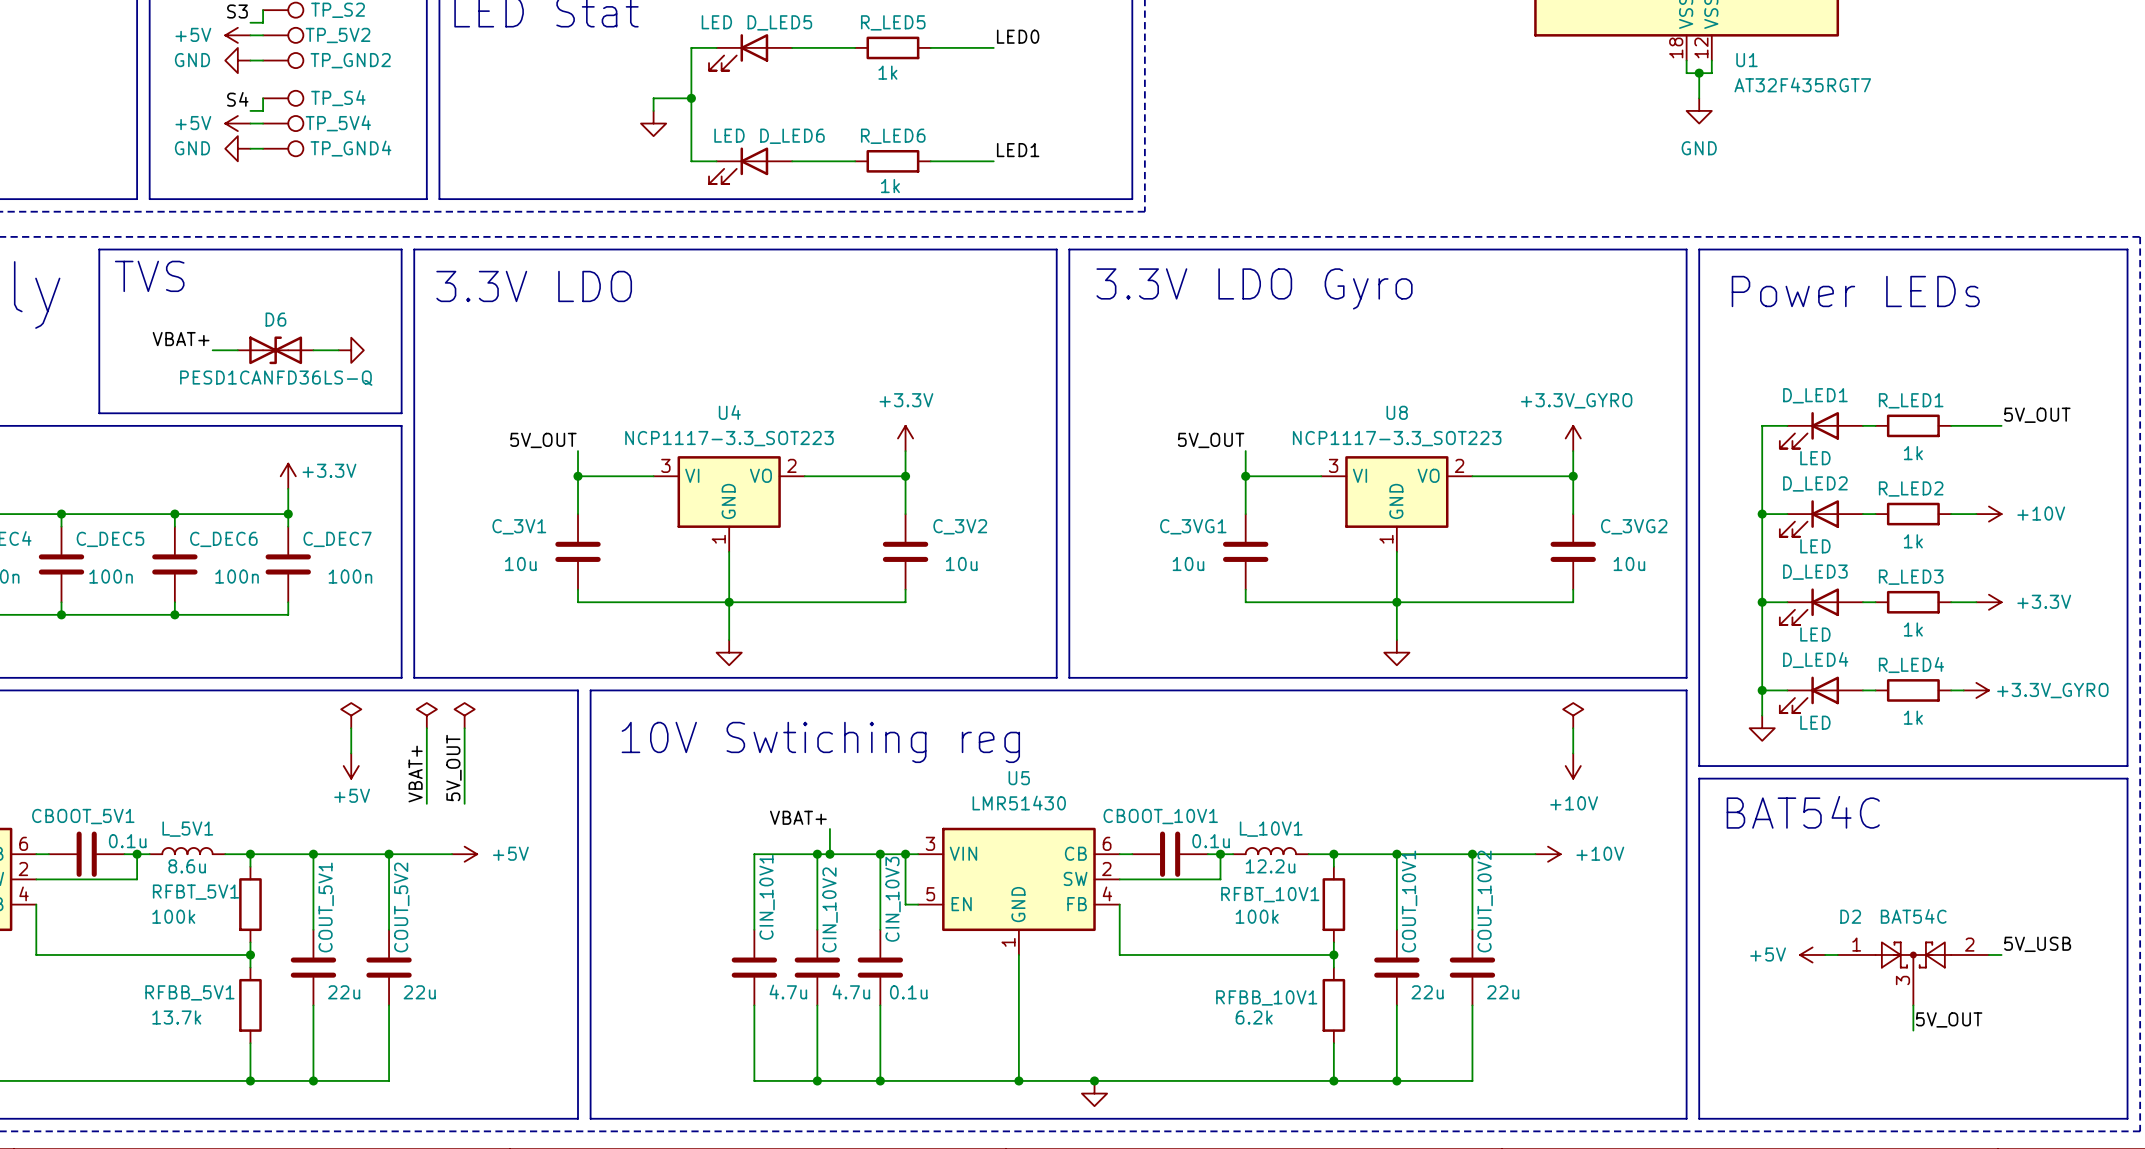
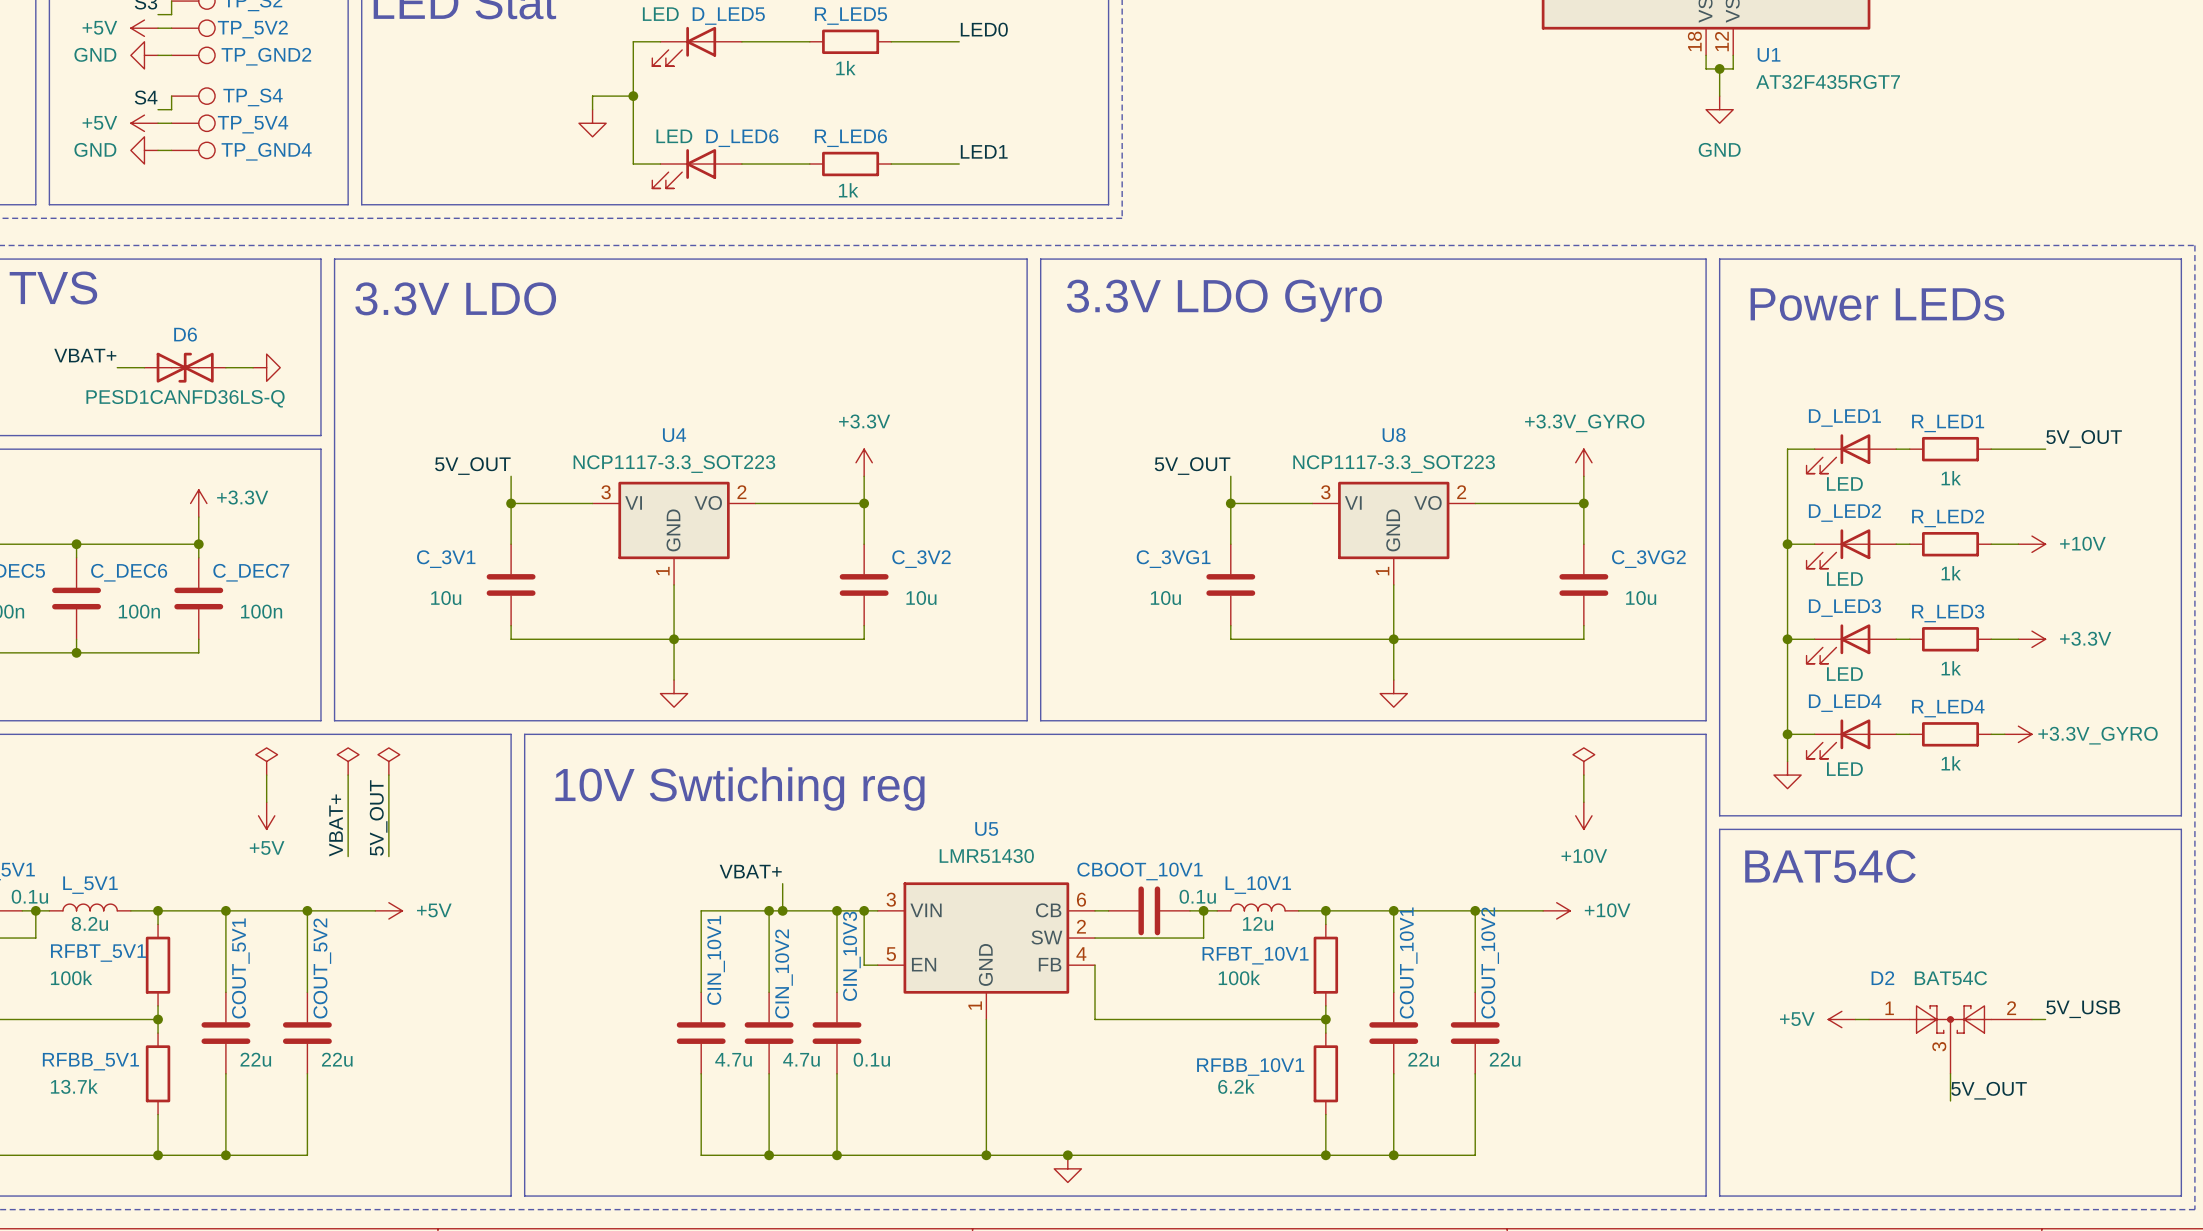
L_5V1 value: 8.6u (187, 866) -> 8.2u (89, 923)
L_10V1 value: 12.2u (1270, 866) -> 12u (1258, 923)

